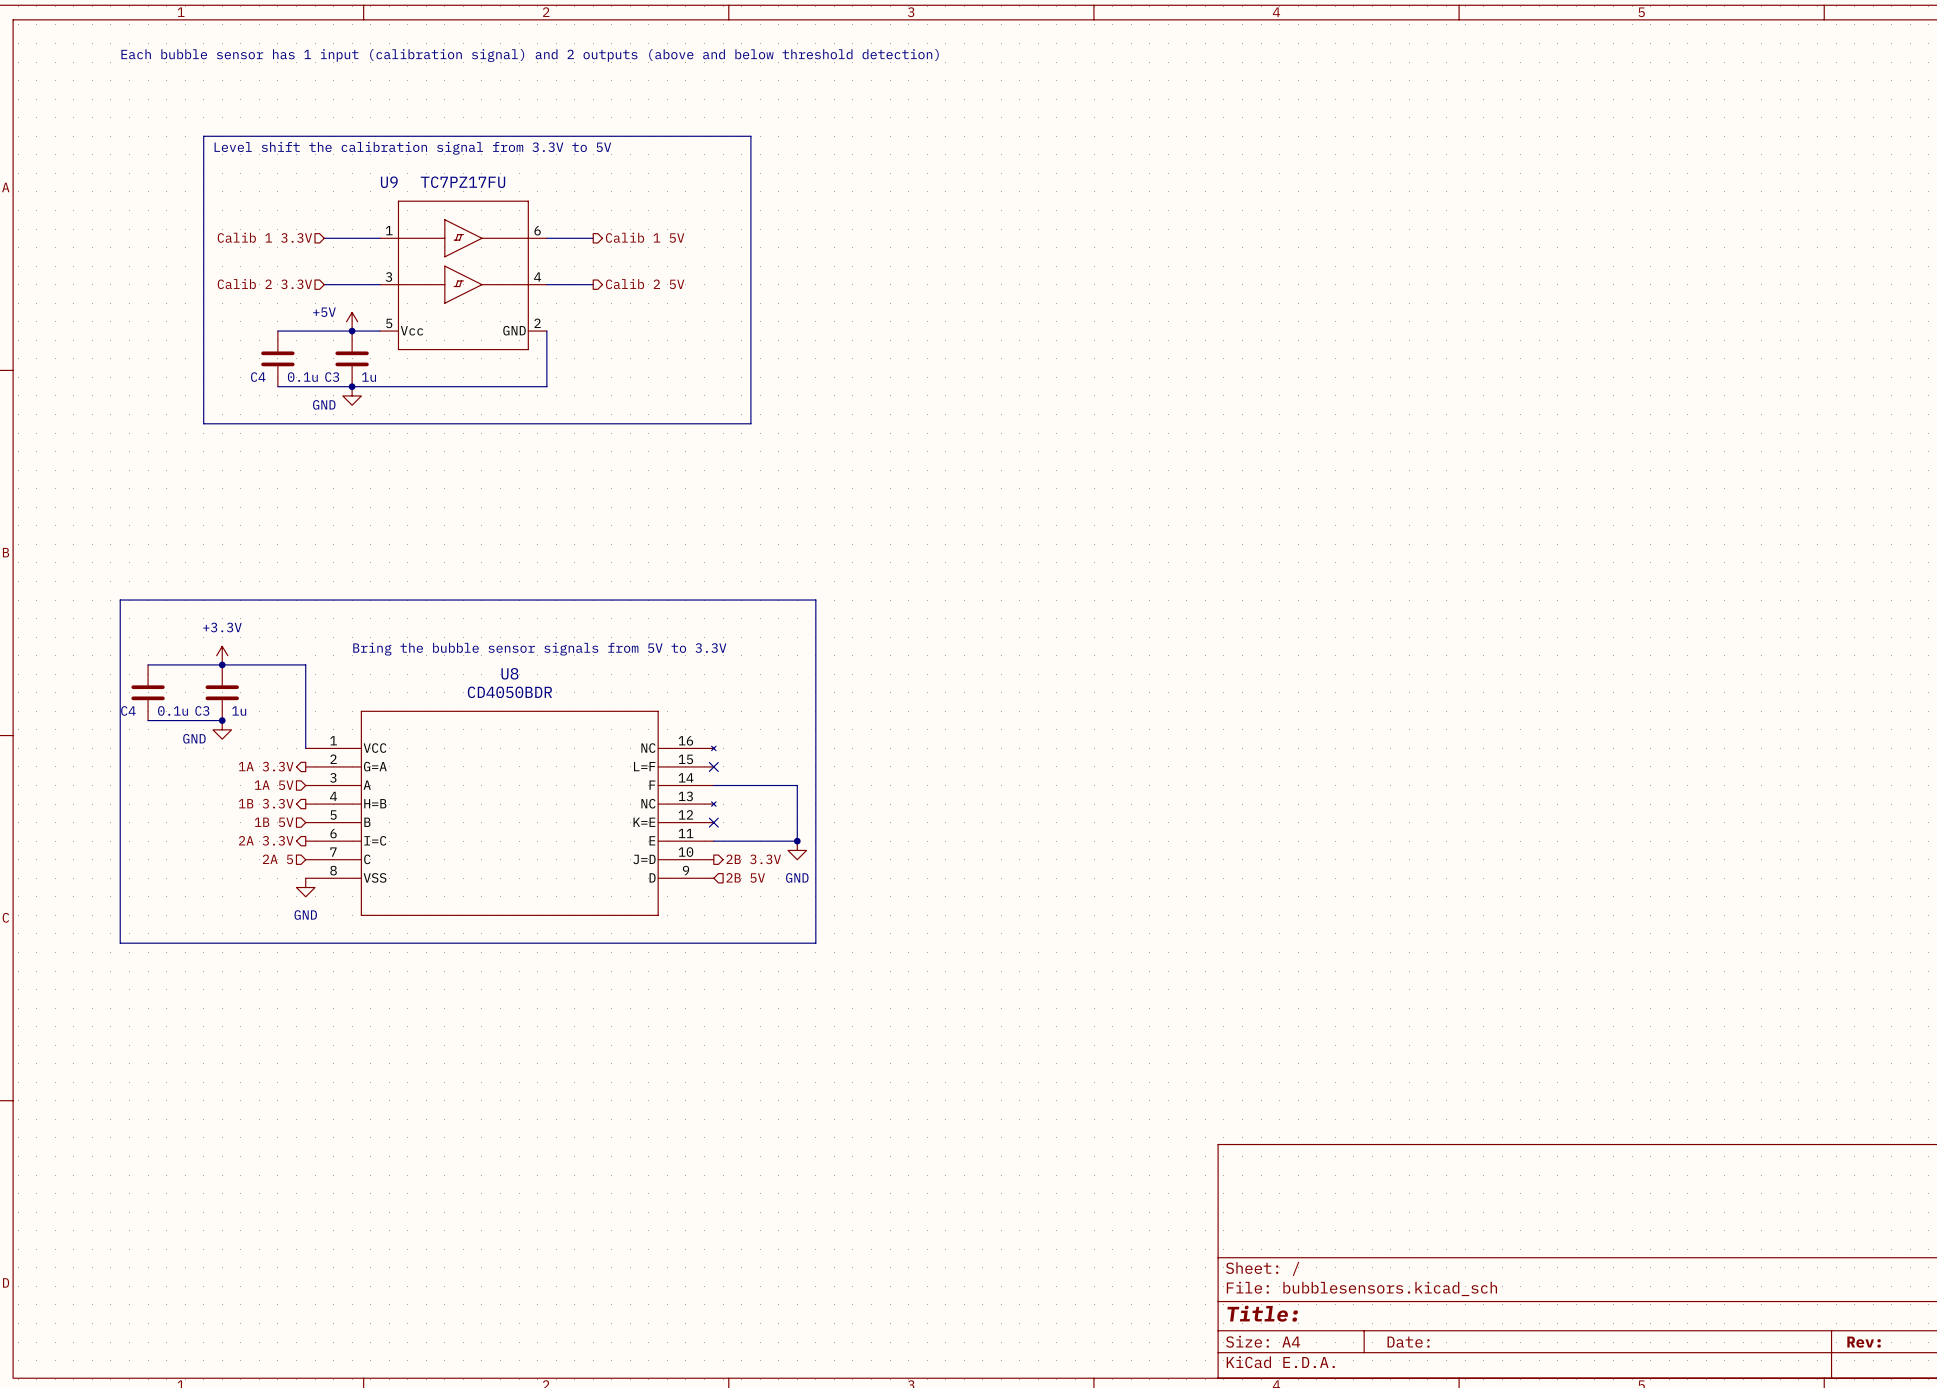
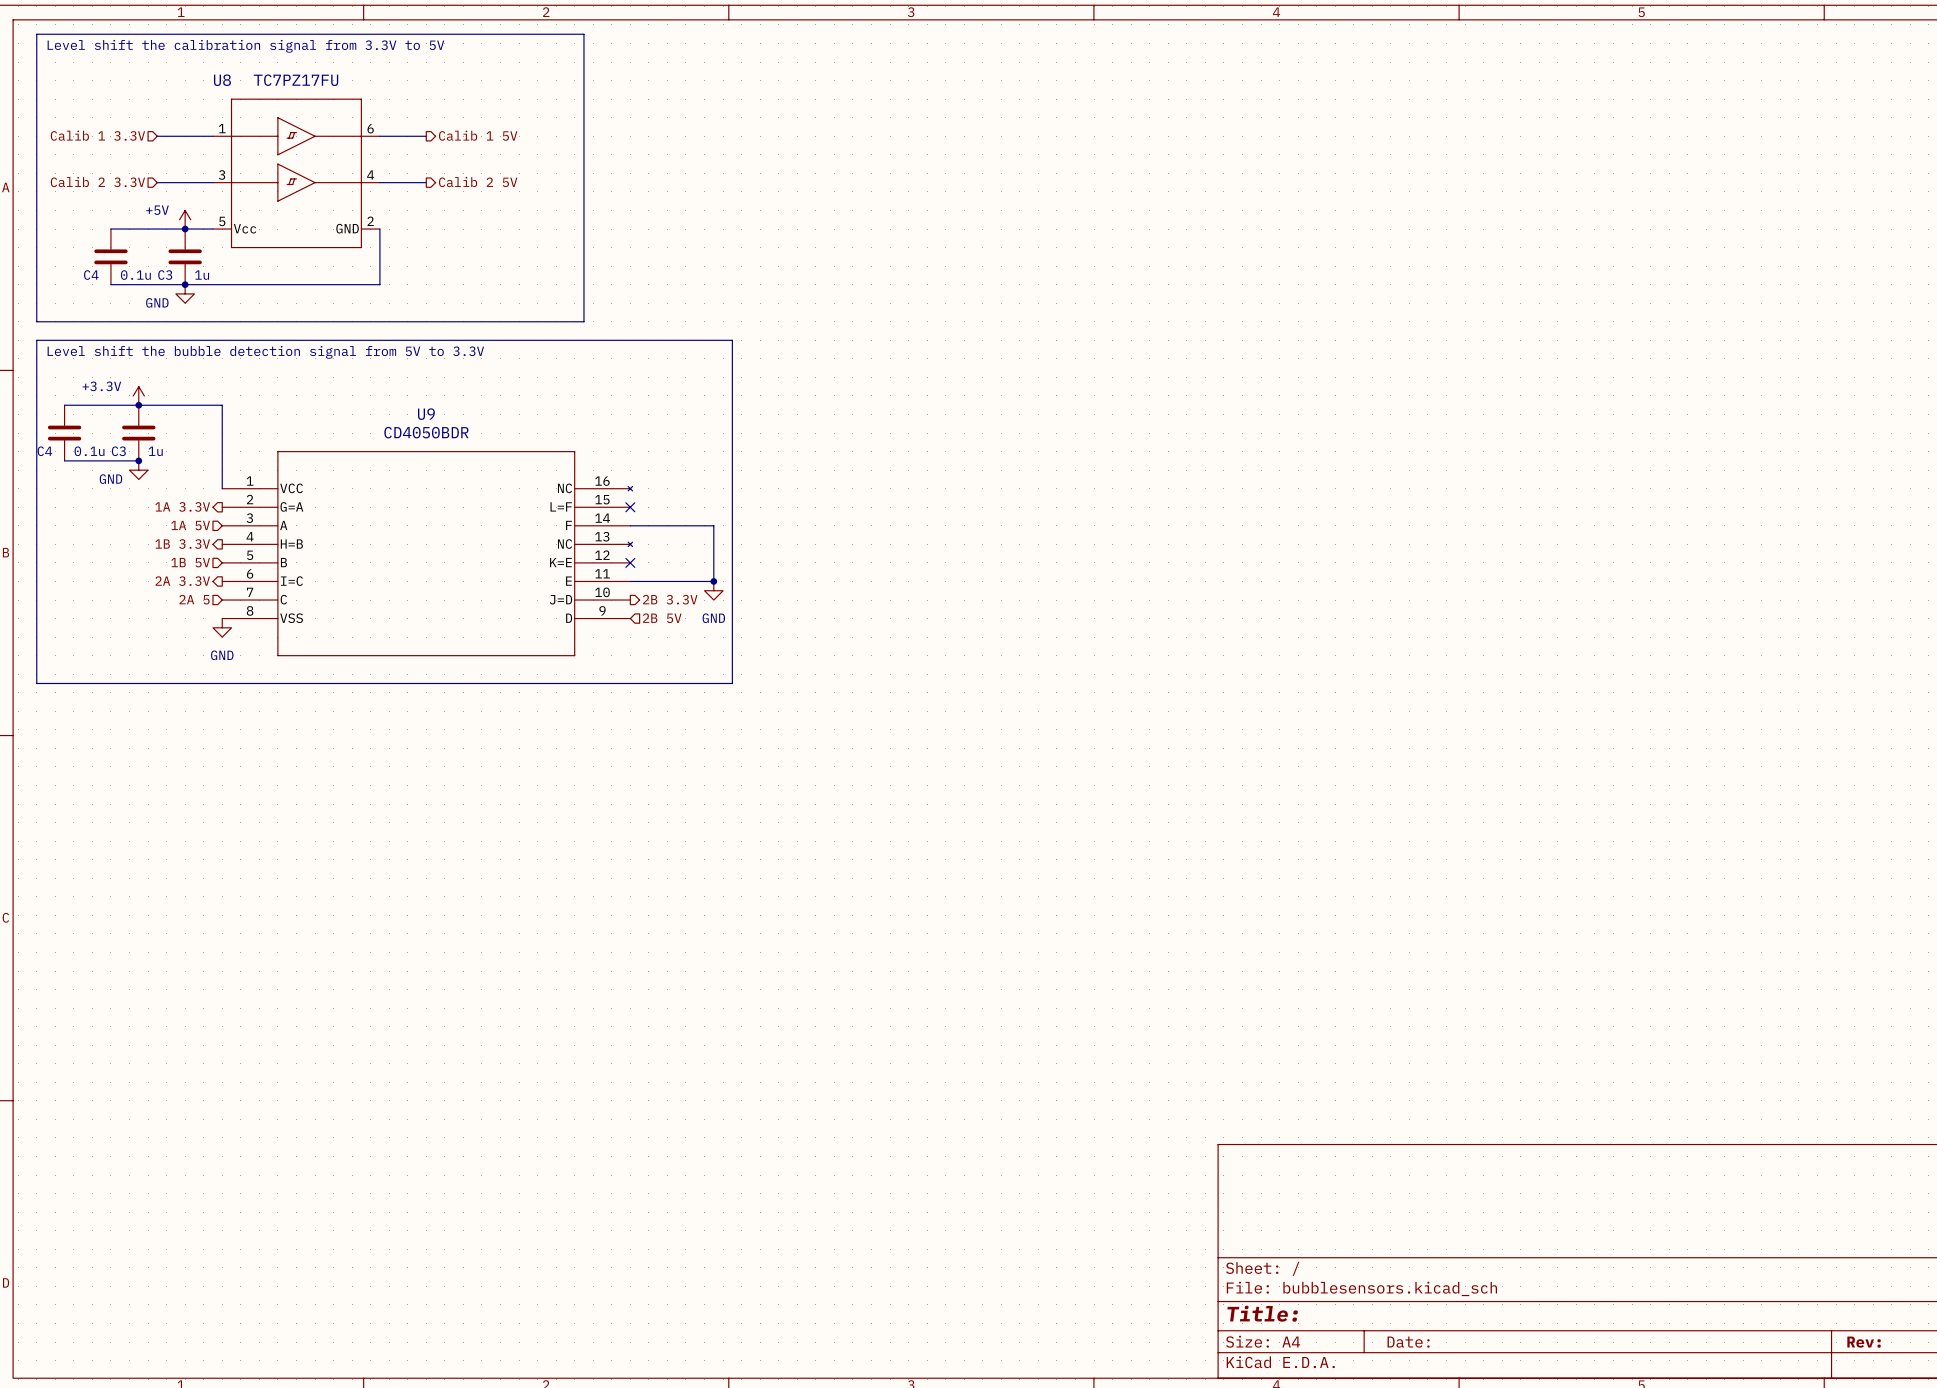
line: none -> (36, 34) (583, 34) (583, 321) (36, 321) (36, 34)
text: none -> Level shift the calibration signal from 3.3V to 5V (245, 46)
text: Each bubble sensor has 1 input (calibration signal) and 2 outputs (above and below threshold detection) (530, 55) -> none
hierarchical label: none -> Calib 1 3.3V (97, 135)
hierarchical label: none -> Calib 1 5V (478, 135)
wire: none -> (157, 136) (212, 136)
line: (203, 136) (750, 136) (750, 423) (203, 423) (203, 136) -> none
text: Level shift the calibration signal from 3.3V to 5V (412, 148) -> none
hierarchical label: none -> Calib 2 3.3V (97, 182)
U9 name position: U9 (389, 182) -> U9 (426, 414)
U9 value: TC7PZ17FU (462, 182) -> CD4050BDR (426, 432)
hierarchical label: none -> Calib 2 5V (478, 182)
U9 symbol: [379, 200, 547, 351] -> [222, 451, 633, 657]
power symbol: none -> +5V (185, 219)
wire: none -> (110, 229) (212, 229)
junction: none -> (185, 229)
wire: none -> (379, 229) (379, 284)
hierarchical label: Calib 1 3.3V (264, 237) -> none
hierarchical label: Calib 1 5V (645, 237) -> none
wire: (324, 238) (379, 238) -> (157, 182) (212, 182)
wire: (546, 238) (593, 238) -> (379, 182) (426, 182)
C4: none -> 0.1u (110, 256)
C3: none -> 1u (185, 256)
wire: none -> (110, 284) (324, 284)
junction: none -> (185, 284)
hierarchical label: Calib 2 3.3V (264, 284) -> none
wire: (546, 284) (593, 284) -> none
hierarchical label: Calib 2 5V (645, 284) -> none
power symbol: none -> GND (185, 293)
power symbol: +5V (352, 321) -> none
wire: (277, 331) (379, 331) -> none
junction: (352, 331) -> none
wire: (546, 331) (546, 386) (277, 386) -> none
line: none -> (36, 340) (36, 683) (732, 683) (732, 340) (36, 340)
text: none -> Level shift the bubble detection signal from 5V to 3.3V (265, 352)
C4: 0.1u (277, 358) -> none
C3: 1u (352, 358) -> none
junction: (352, 386) -> none
power symbol: none -> +3.3V (138, 395)
power symbol: GND (352, 395) -> none
wire: none -> (64, 405) (222, 405) (222, 488)
junction: none -> (138, 405)
C4: none -> 0.1u (64, 433)
C3: none -> 1u (138, 433)
wire: none -> (64, 460) (138, 460)
junction: none -> (138, 460)
power symbol: none -> GND (138, 470)
hierarchical label: none -> 1A 3.3V (182, 506)
no-connect mark: none -> (630, 507)
hierarchical label: none -> 1A 5V (190, 525)
wire: none -> (630, 525) (713, 525) (713, 581) (630, 581)
hierarchical label: none -> 1B 3.3V (182, 544)
hierarchical label: none -> 1B 5V (190, 562)
no-connect mark: none -> (630, 562)
hierarchical label: none -> 2A 3.3V (182, 581)
junction: none -> (713, 581)
power symbol: none -> GND (713, 590)
hierarchical label: none -> 2A 5 (194, 599)
hierarchical label: none -> 2B 3.3V (670, 599)
line: (120, 600) (815, 600) (815, 943) (120, 943) (120, 600) -> none
hierarchical label: none -> 2B 5V (662, 618)
text: Bring the bubble sensor signals from 5V to 3.3V (539, 649) -> none
power symbol: +3.3V (222, 655) -> none
wire: (148, 664) (305, 664) (305, 748) -> none
junction: (222, 664) -> none
U8 name position: U8 (509, 673) -> U8 (222, 80)
C4: 0.1u (148, 692) -> none
C3: 1u (222, 692) -> none
U8 value: CD4050BDR (509, 692) -> TC7PZ17FU (296, 80)
U8 symbol: [305, 710, 717, 916] -> [212, 98, 380, 249]
wire: (148, 720) (222, 720) -> none
junction: (222, 720) -> none
power symbol position: GND (222, 729) -> GND (222, 627)
power symbol text position: GND (194, 738) -> GND (222, 655)
hierarchical label: 1A 3.3V (266, 766) -> none
no-connect mark: (713, 766) -> none
hierarchical label: 1A 5V (274, 785) -> none
wire: (713, 785) (797, 785) (797, 841) (713, 841) -> none
hierarchical label: 1B 3.3V (266, 803) -> none
hierarchical label: 1B 5V (274, 822) -> none
no-connect mark: (713, 822) -> none
hierarchical label: 2A 3.3V (266, 840) -> none
junction: (797, 841) -> none
power symbol: GND (797, 850) -> none
hierarchical label: 2A 5 (277, 859) -> none
hierarchical label: 2B 3.3V (753, 859) -> none
hierarchical label: 2B 5V (745, 877) -> none
power symbol: GND (305, 887) -> none

